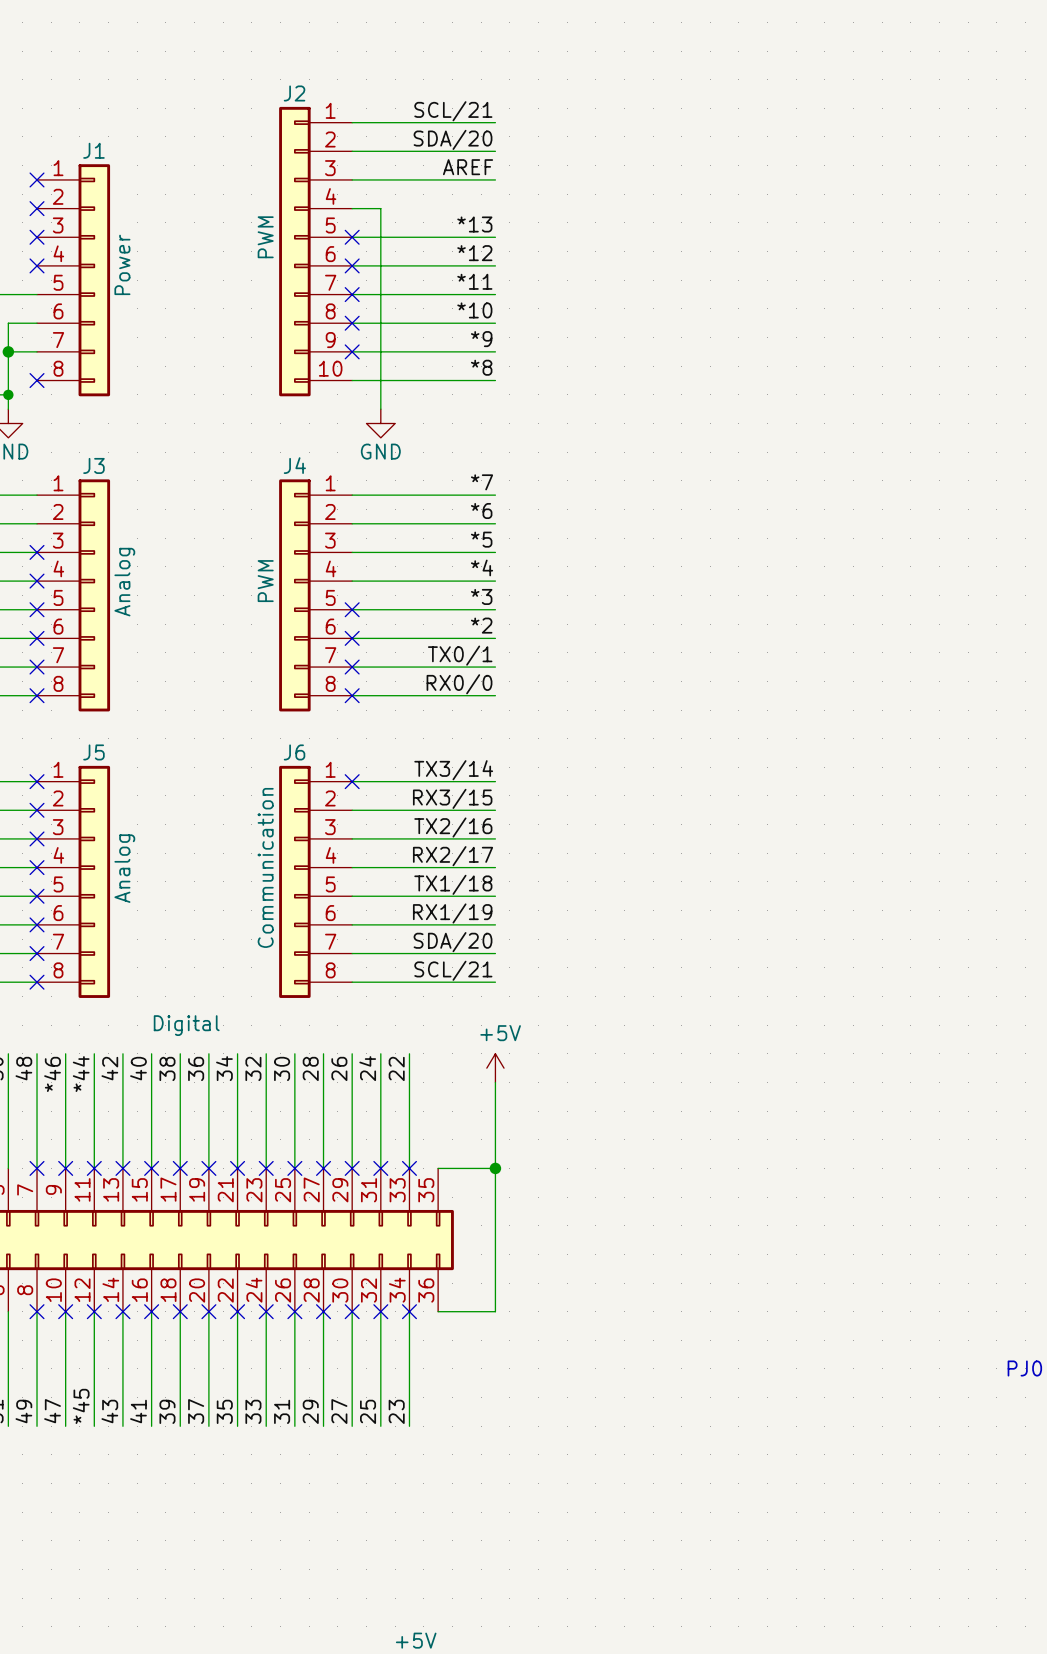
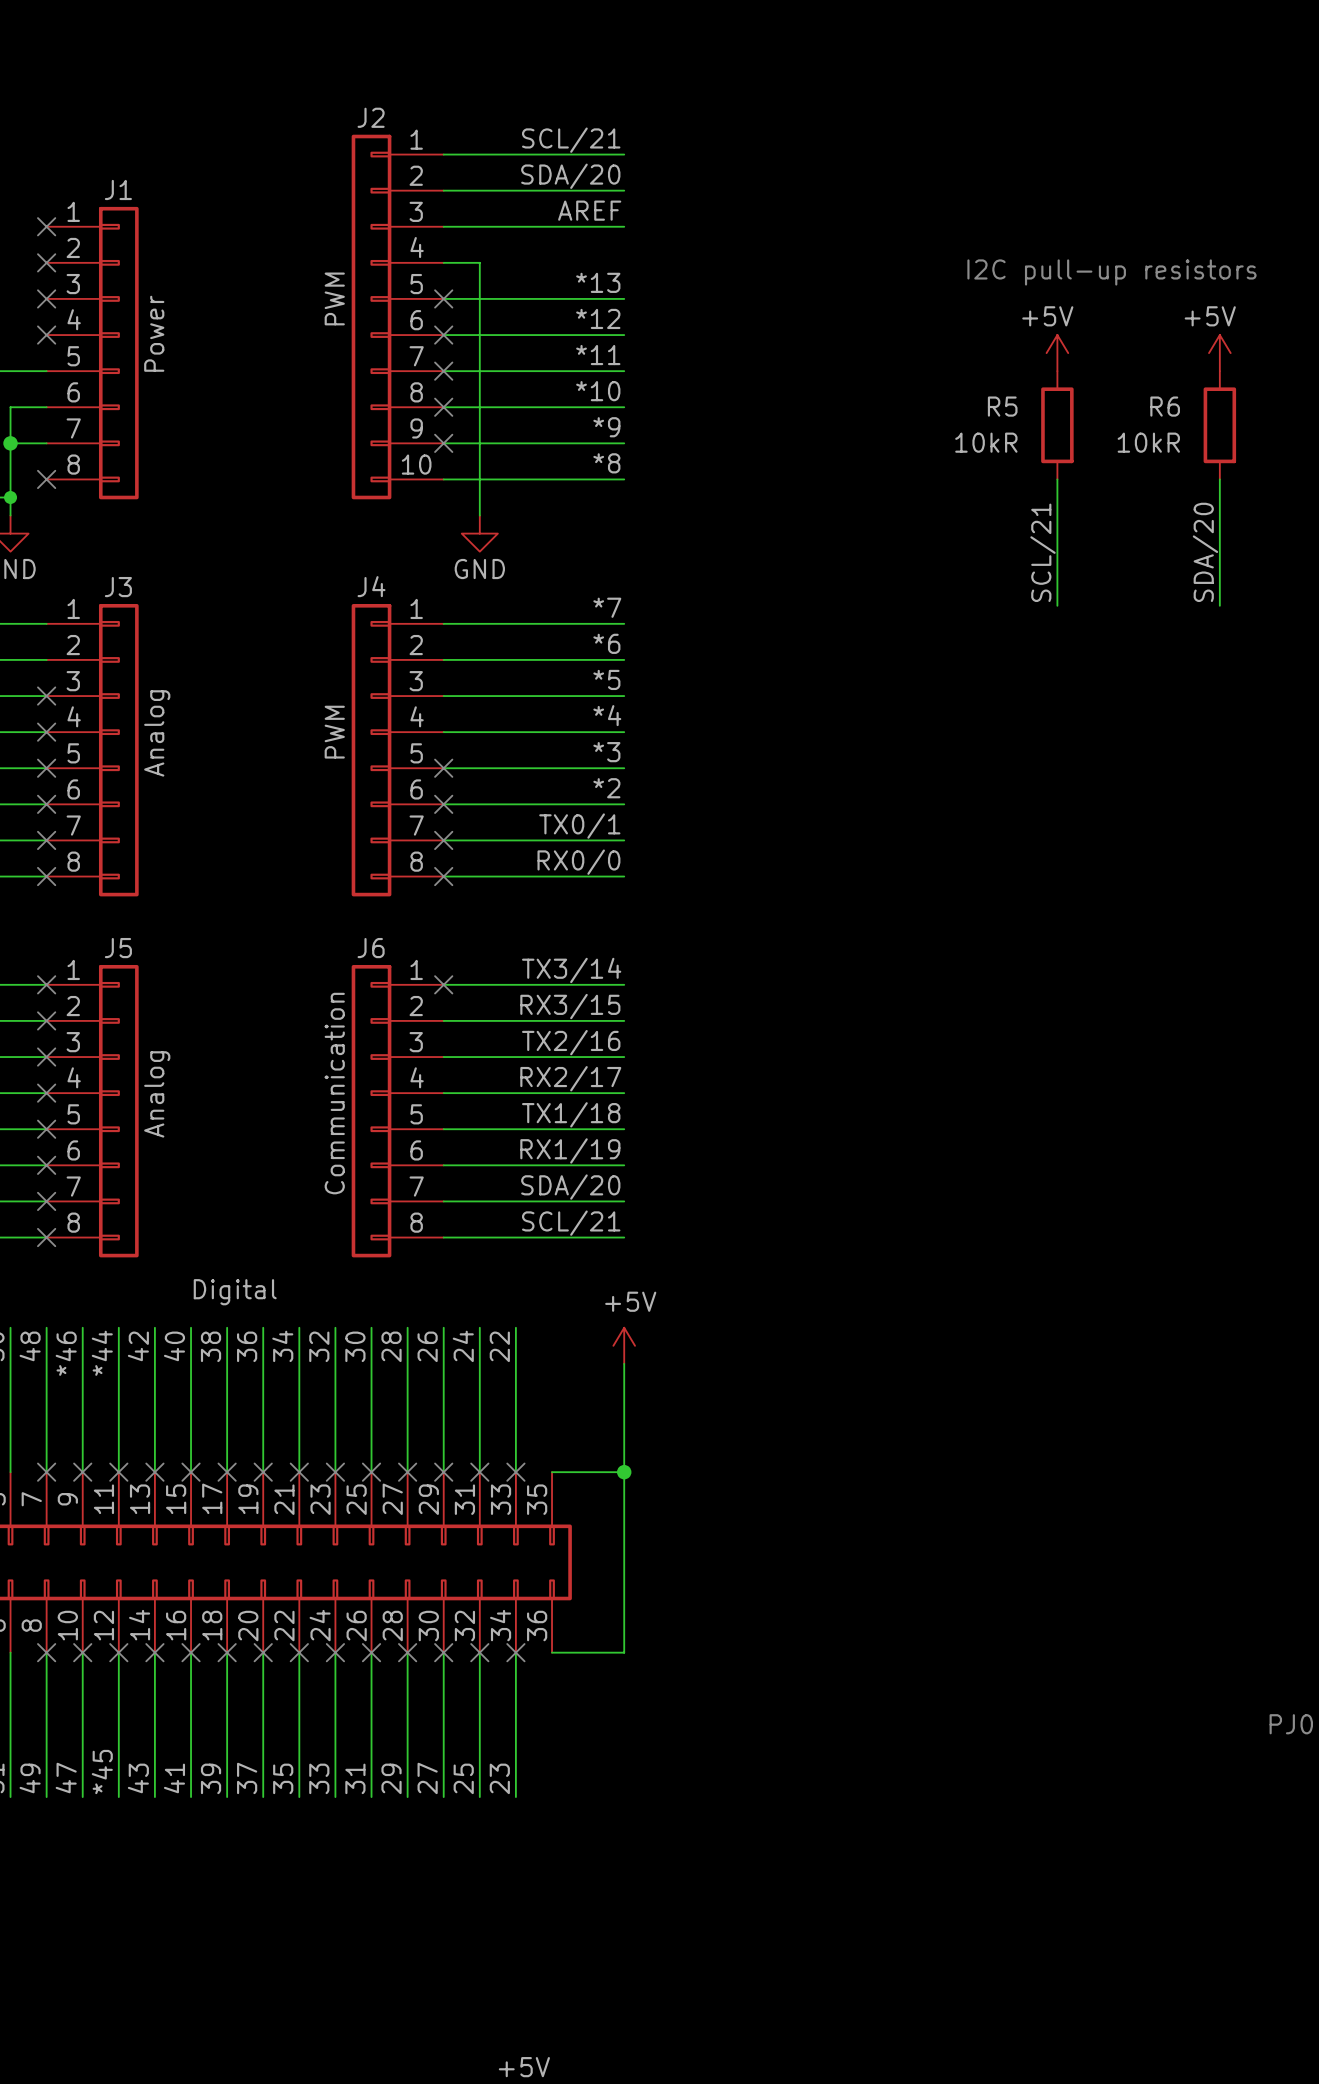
text: none -> I2C pull-up resistors (1111, 272)
power symbol: none -> +5V (1057, 353)
power symbol: none -> +5V (1219, 353)
R5: none -> 10kR (1057, 425)
R6: none -> 10kR (1219, 425)
wire: none -> (1057, 479) (1057, 605)
wire: none -> (1219, 479) (1219, 605)
label: none -> SCL/21 (1043, 552)
label: none -> SDA/20 (1205, 552)

